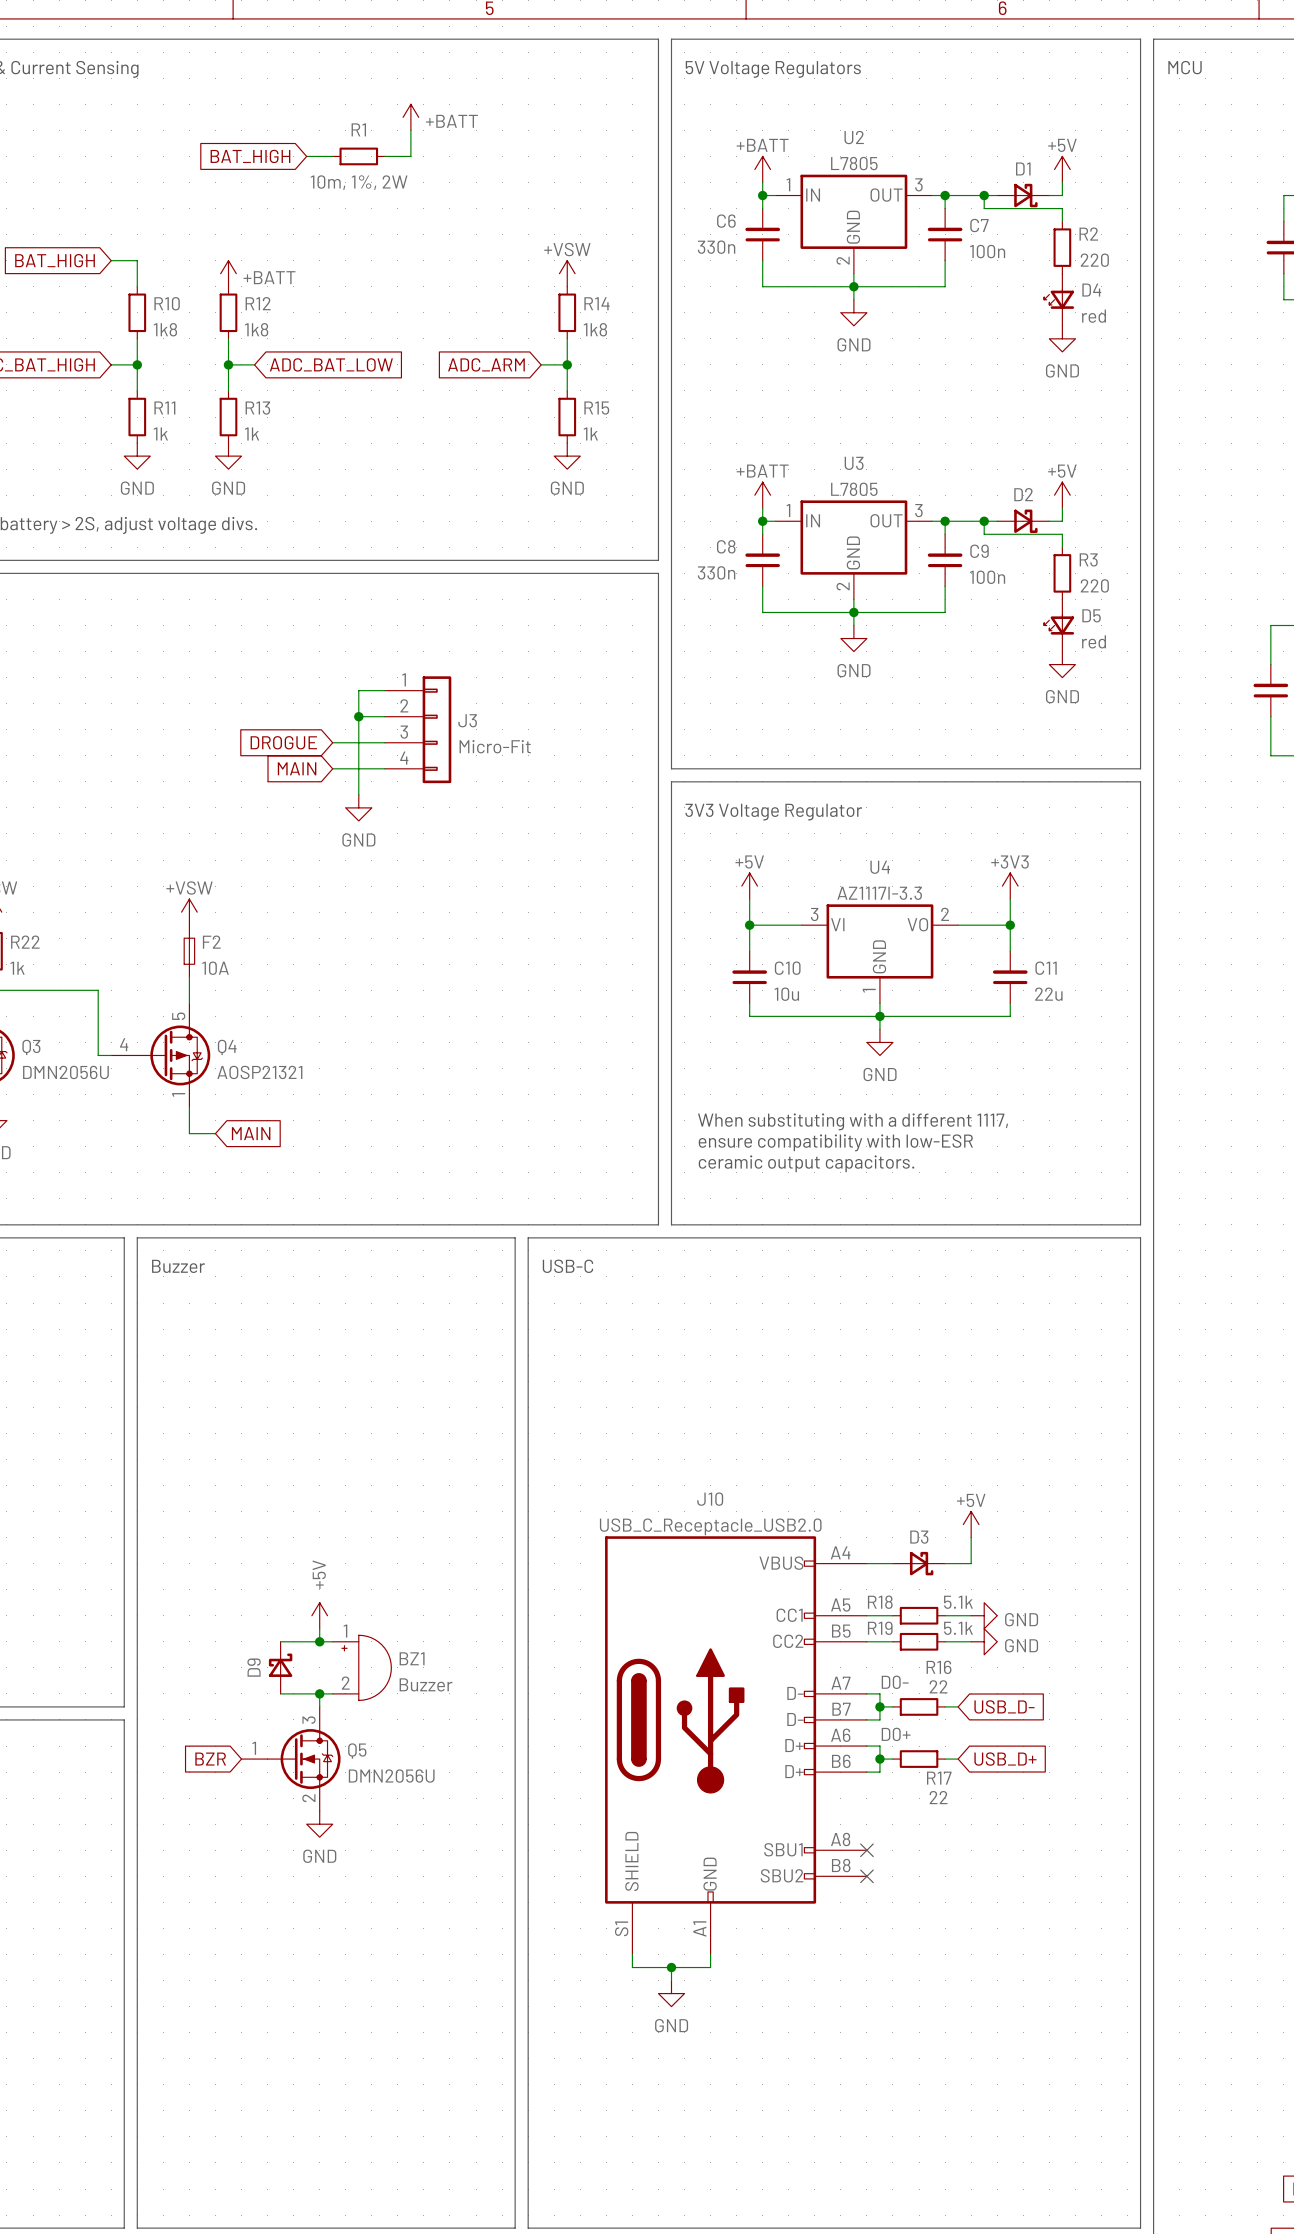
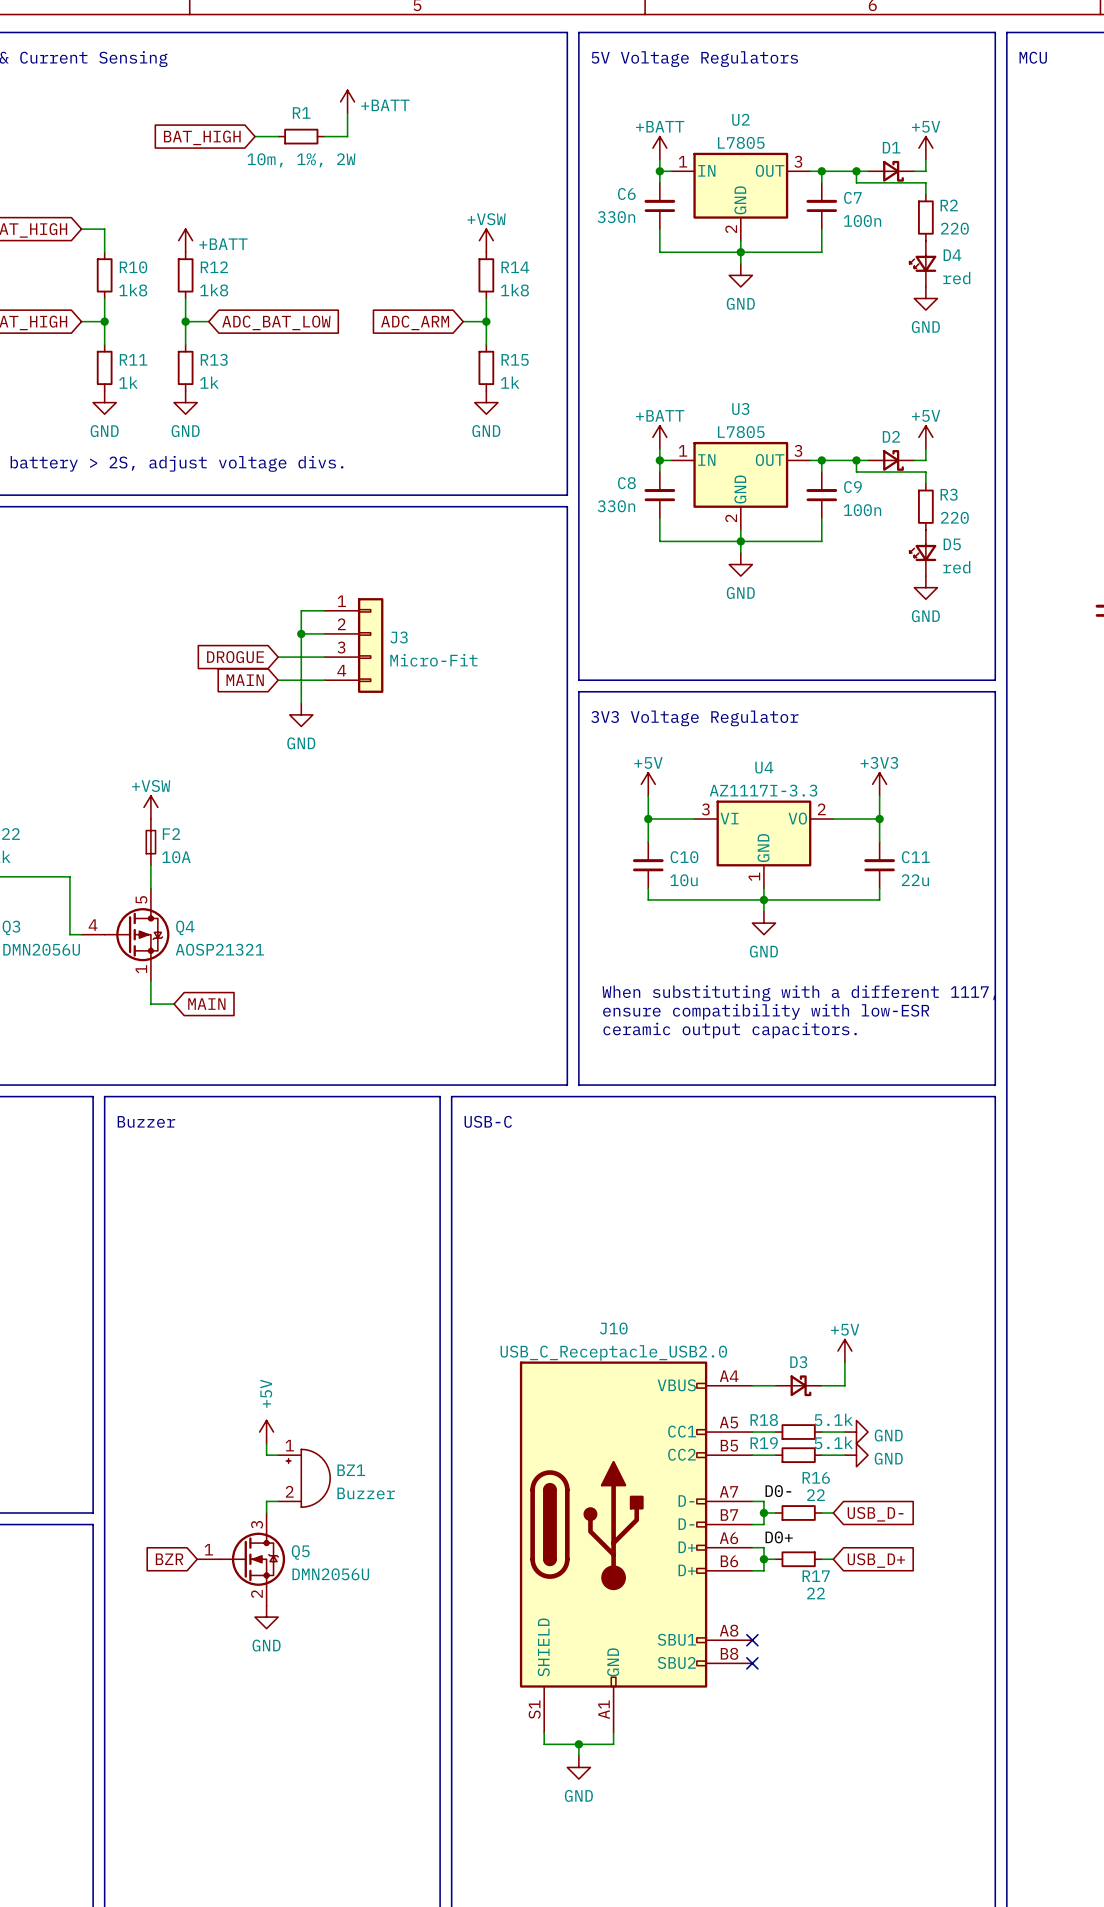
wire: (280, 1641) (319, 1641) -> none
junction: (319, 1641) -> none
D9: (280, 1667) -> none
wire: (280, 1693) (319, 1693) -> none
junction: (319, 1693) -> none

